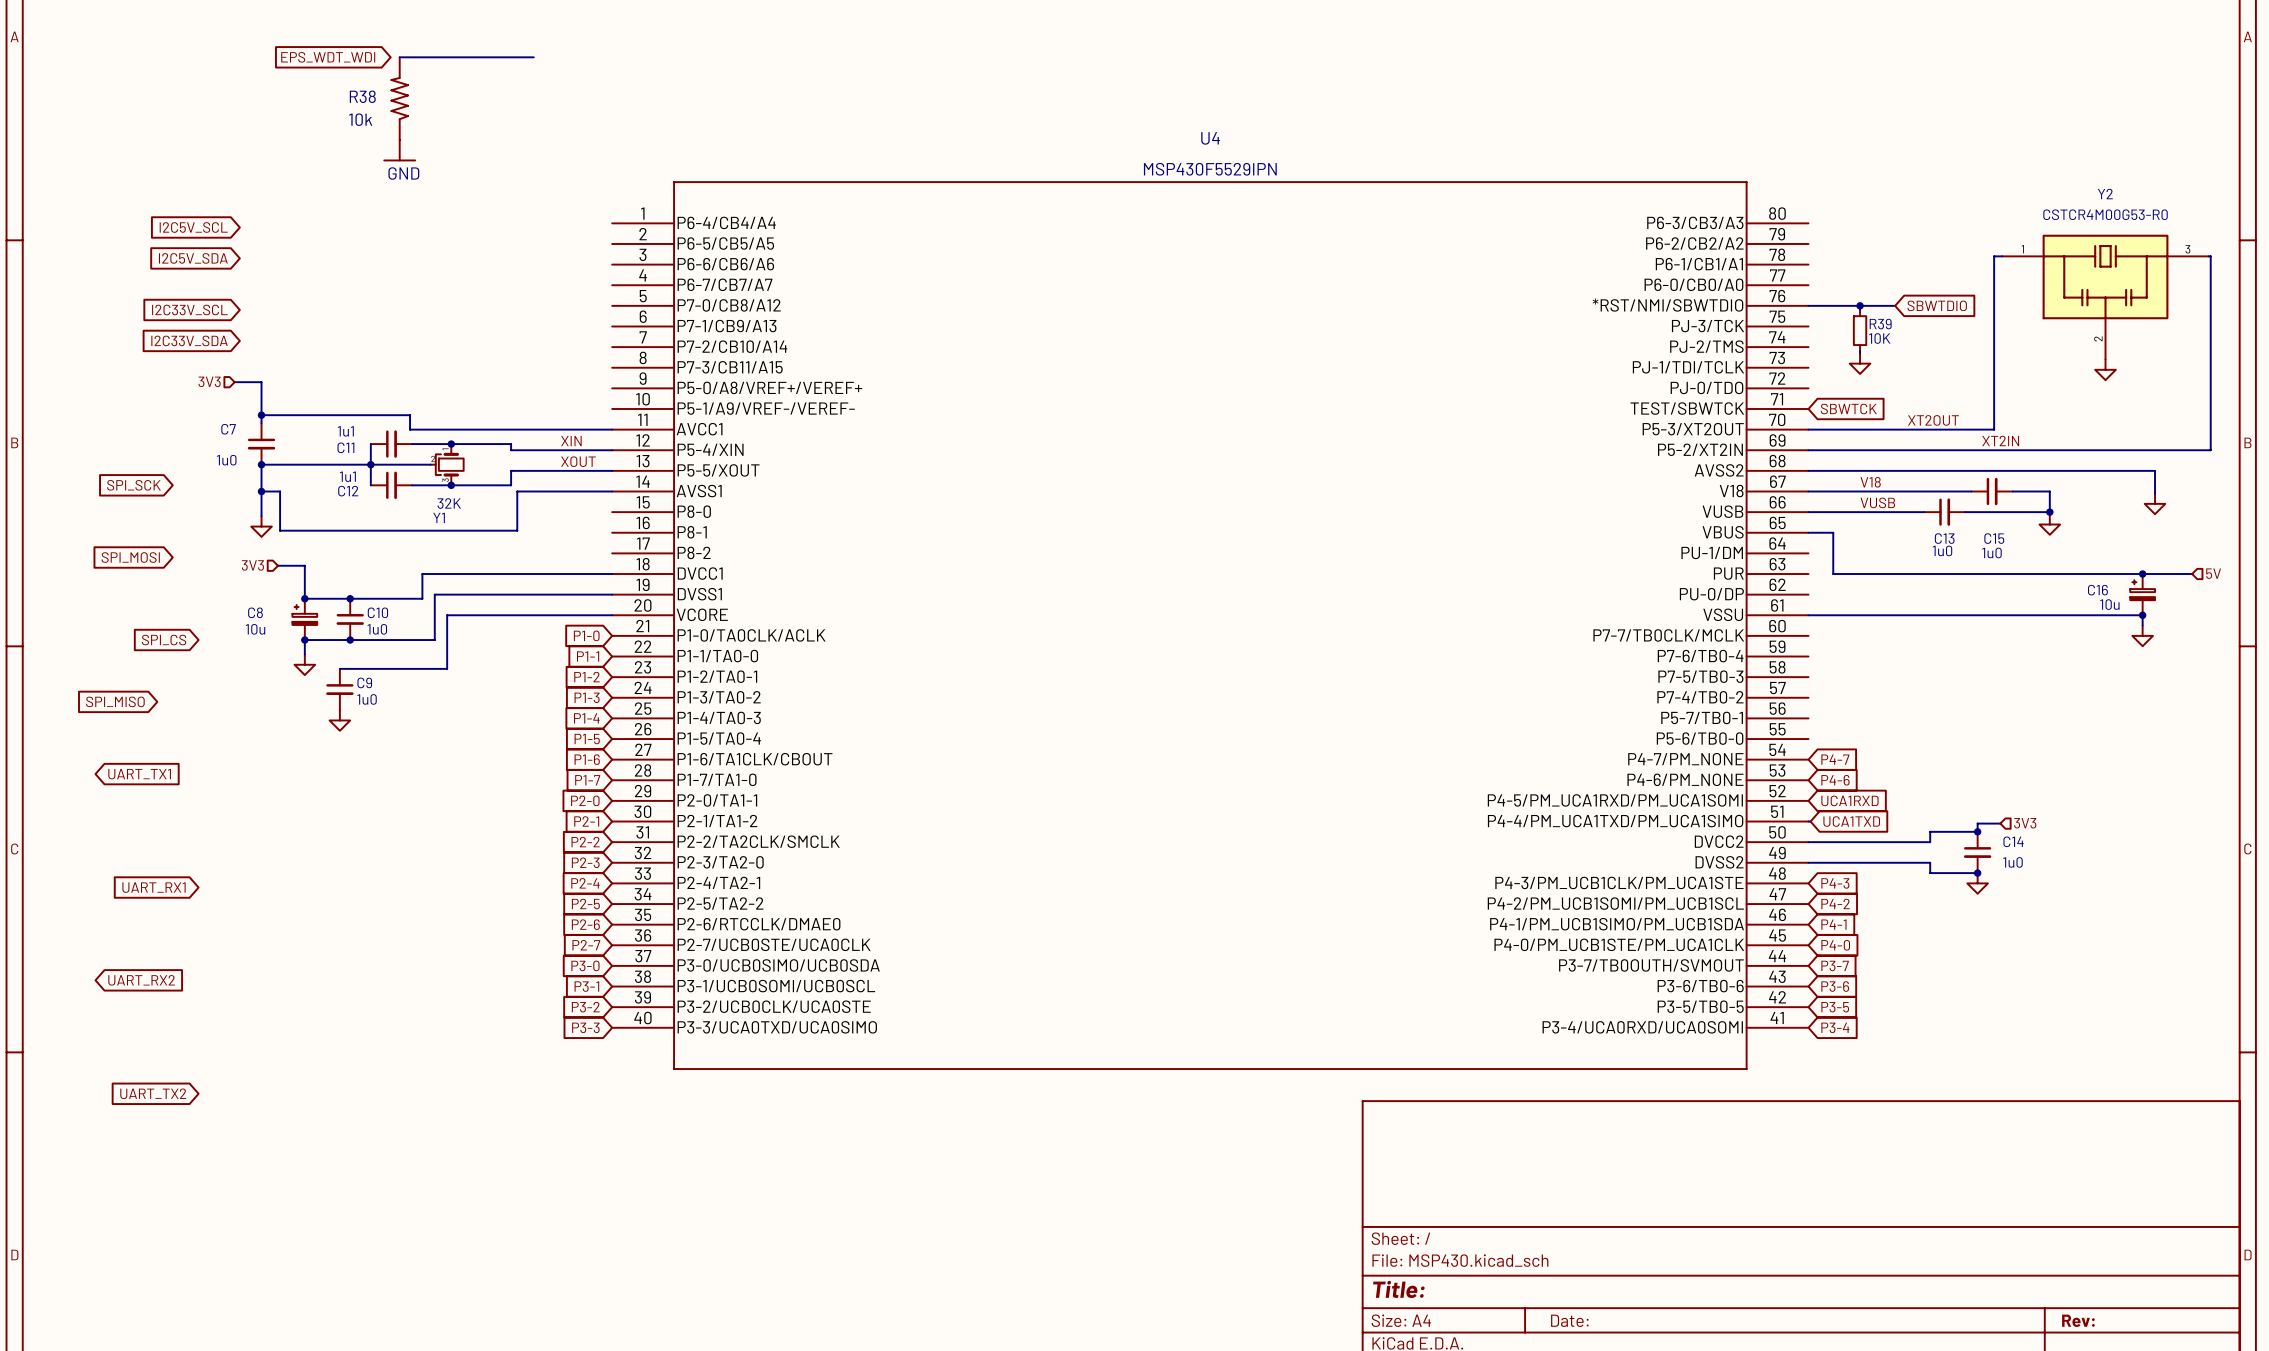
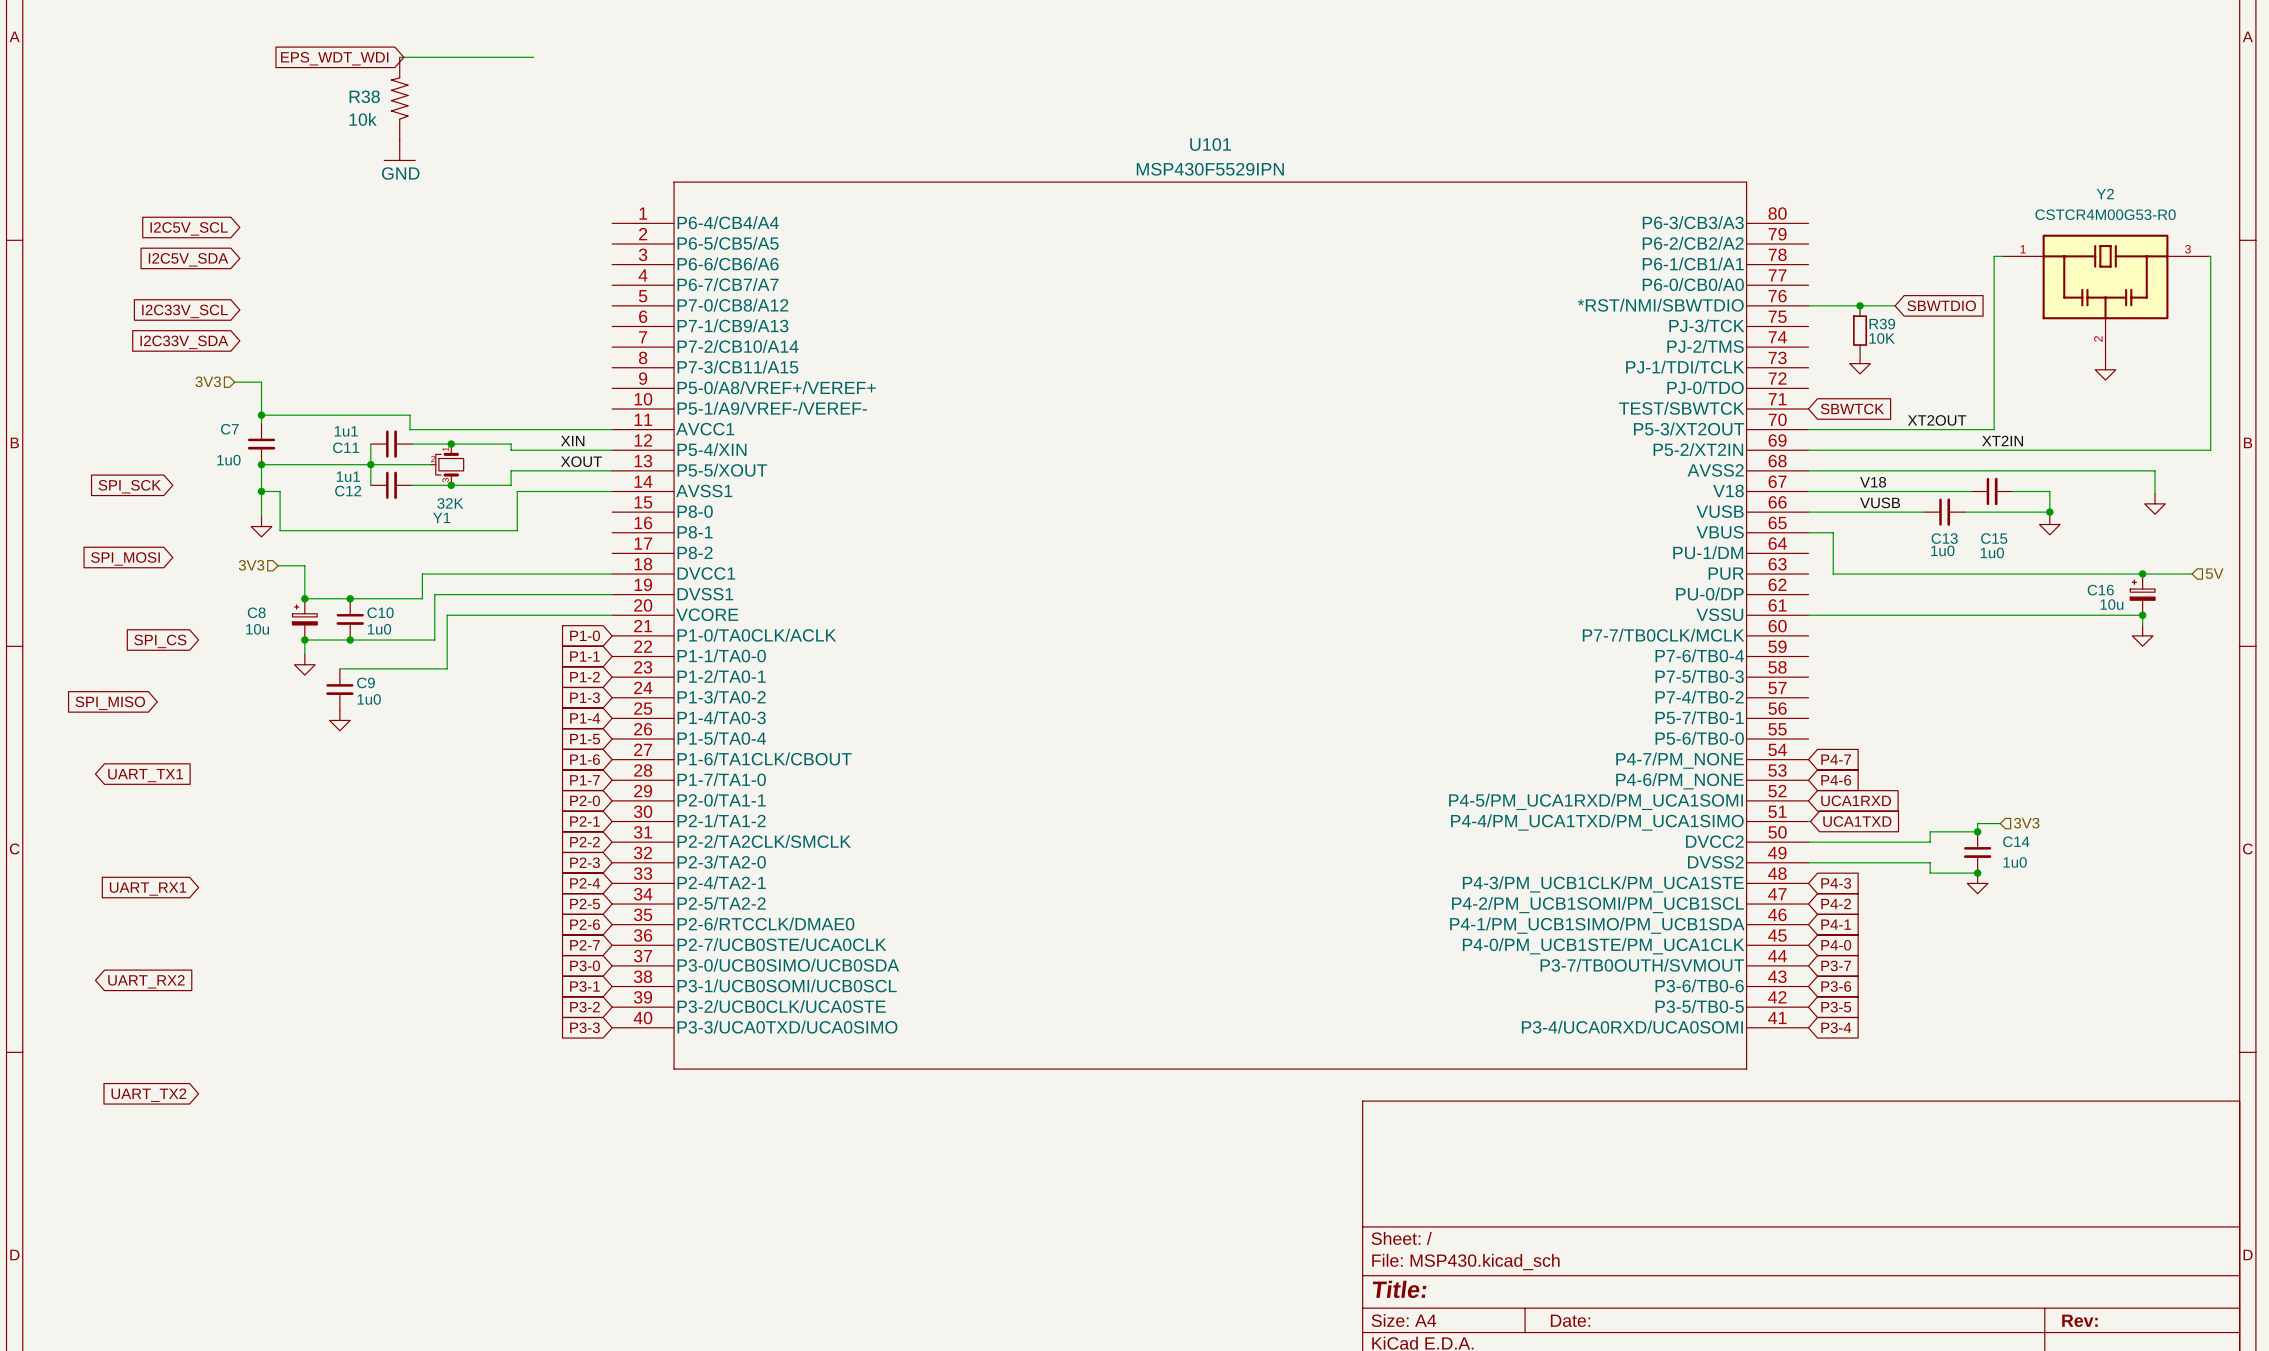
U4 name: U4 (1210, 138) -> U101 (1210, 144)

